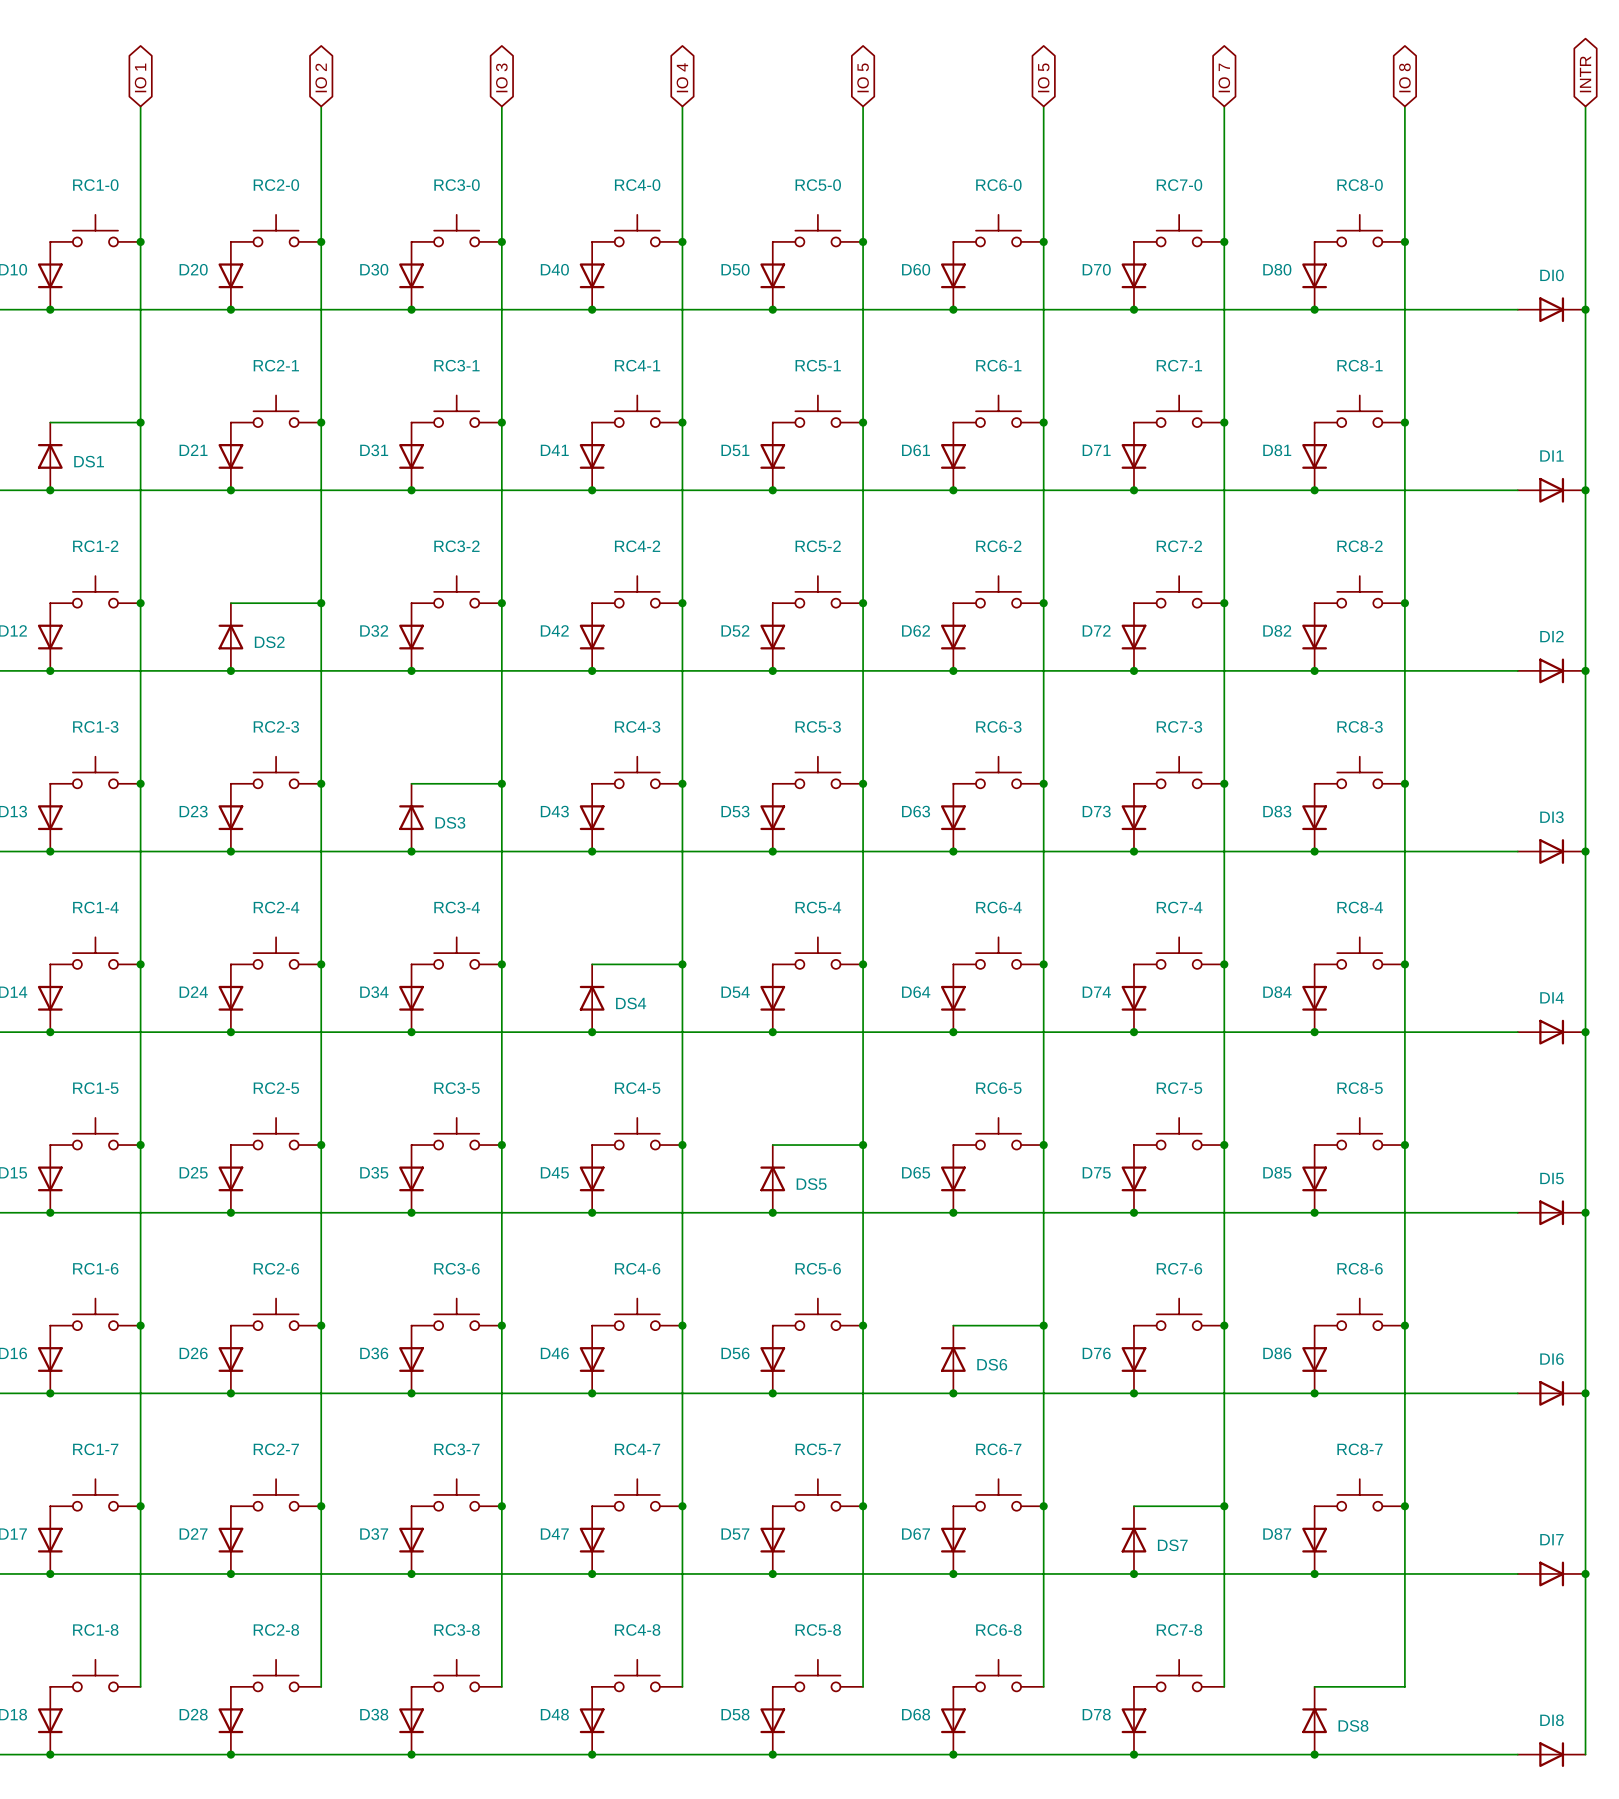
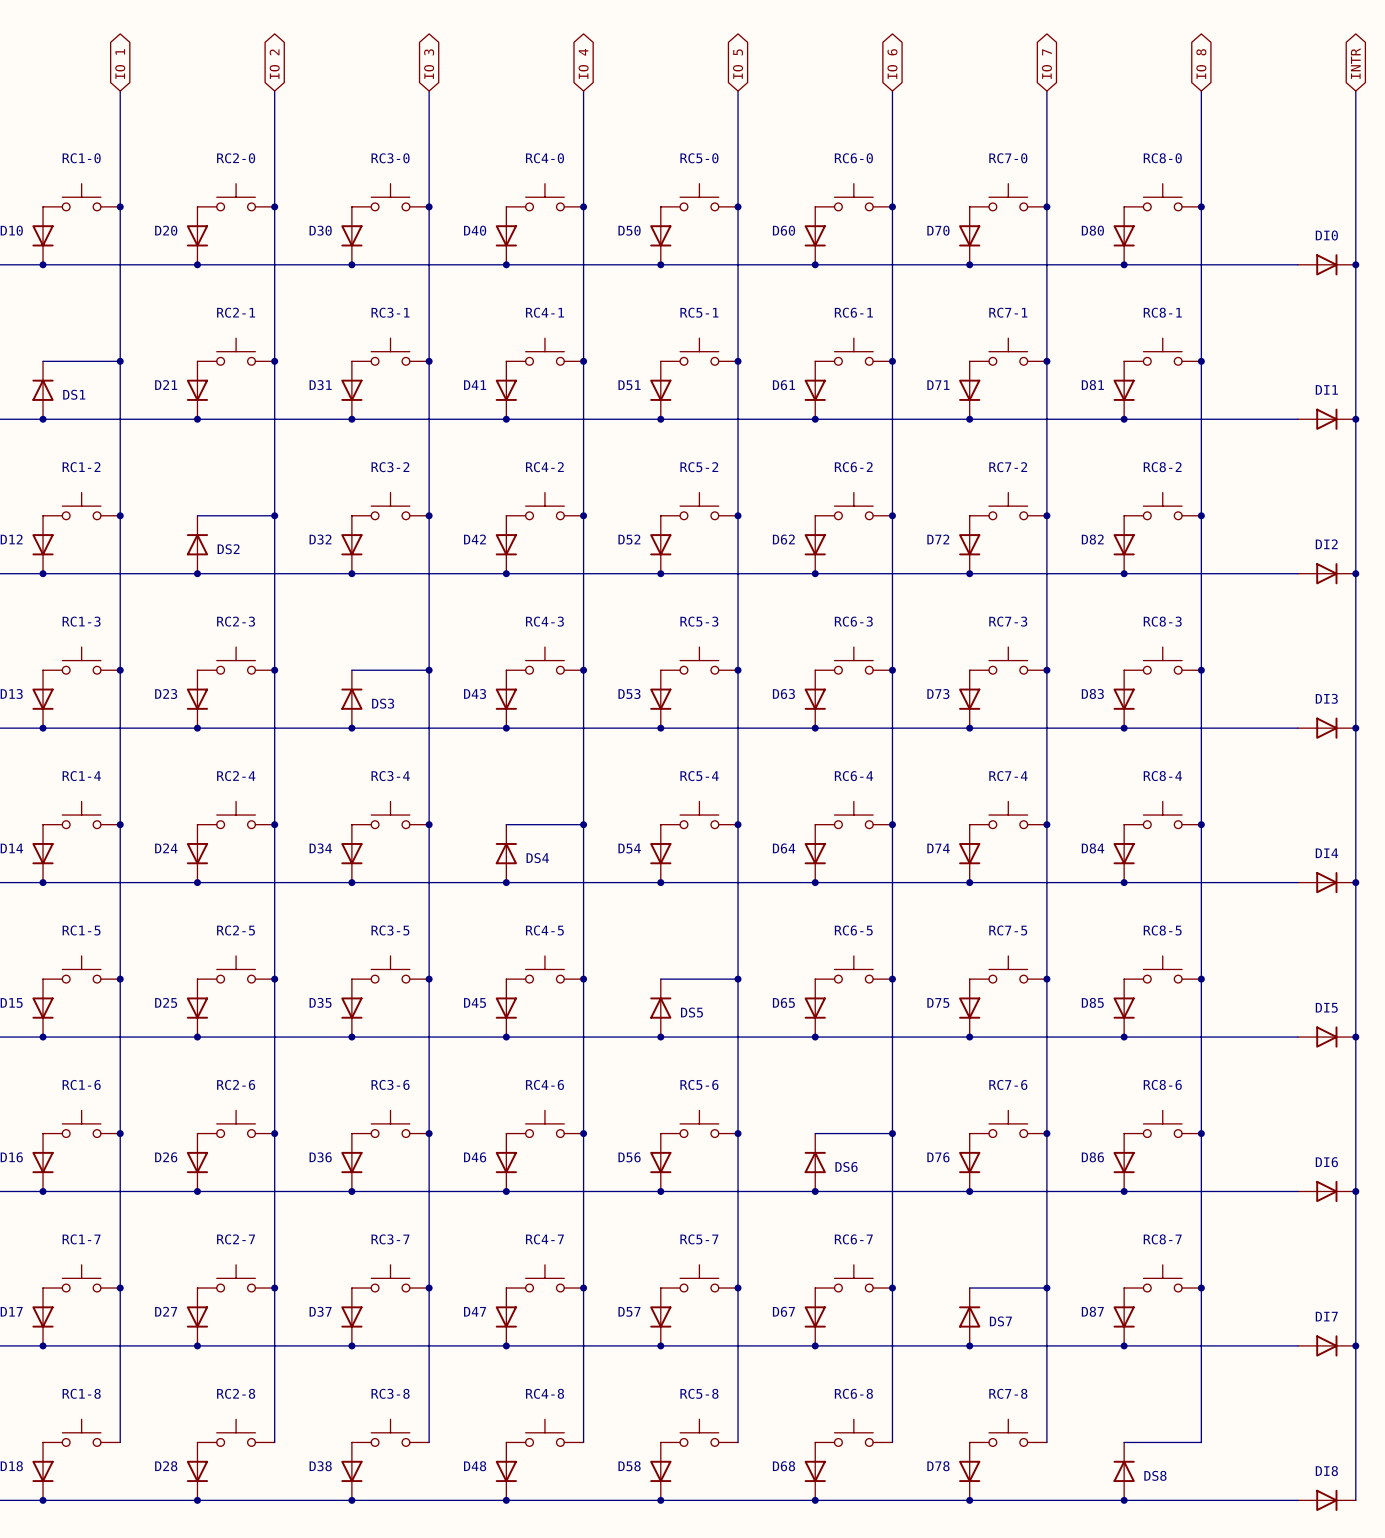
global label: IO 5 (1043, 77) -> IO 6 (892, 64)

